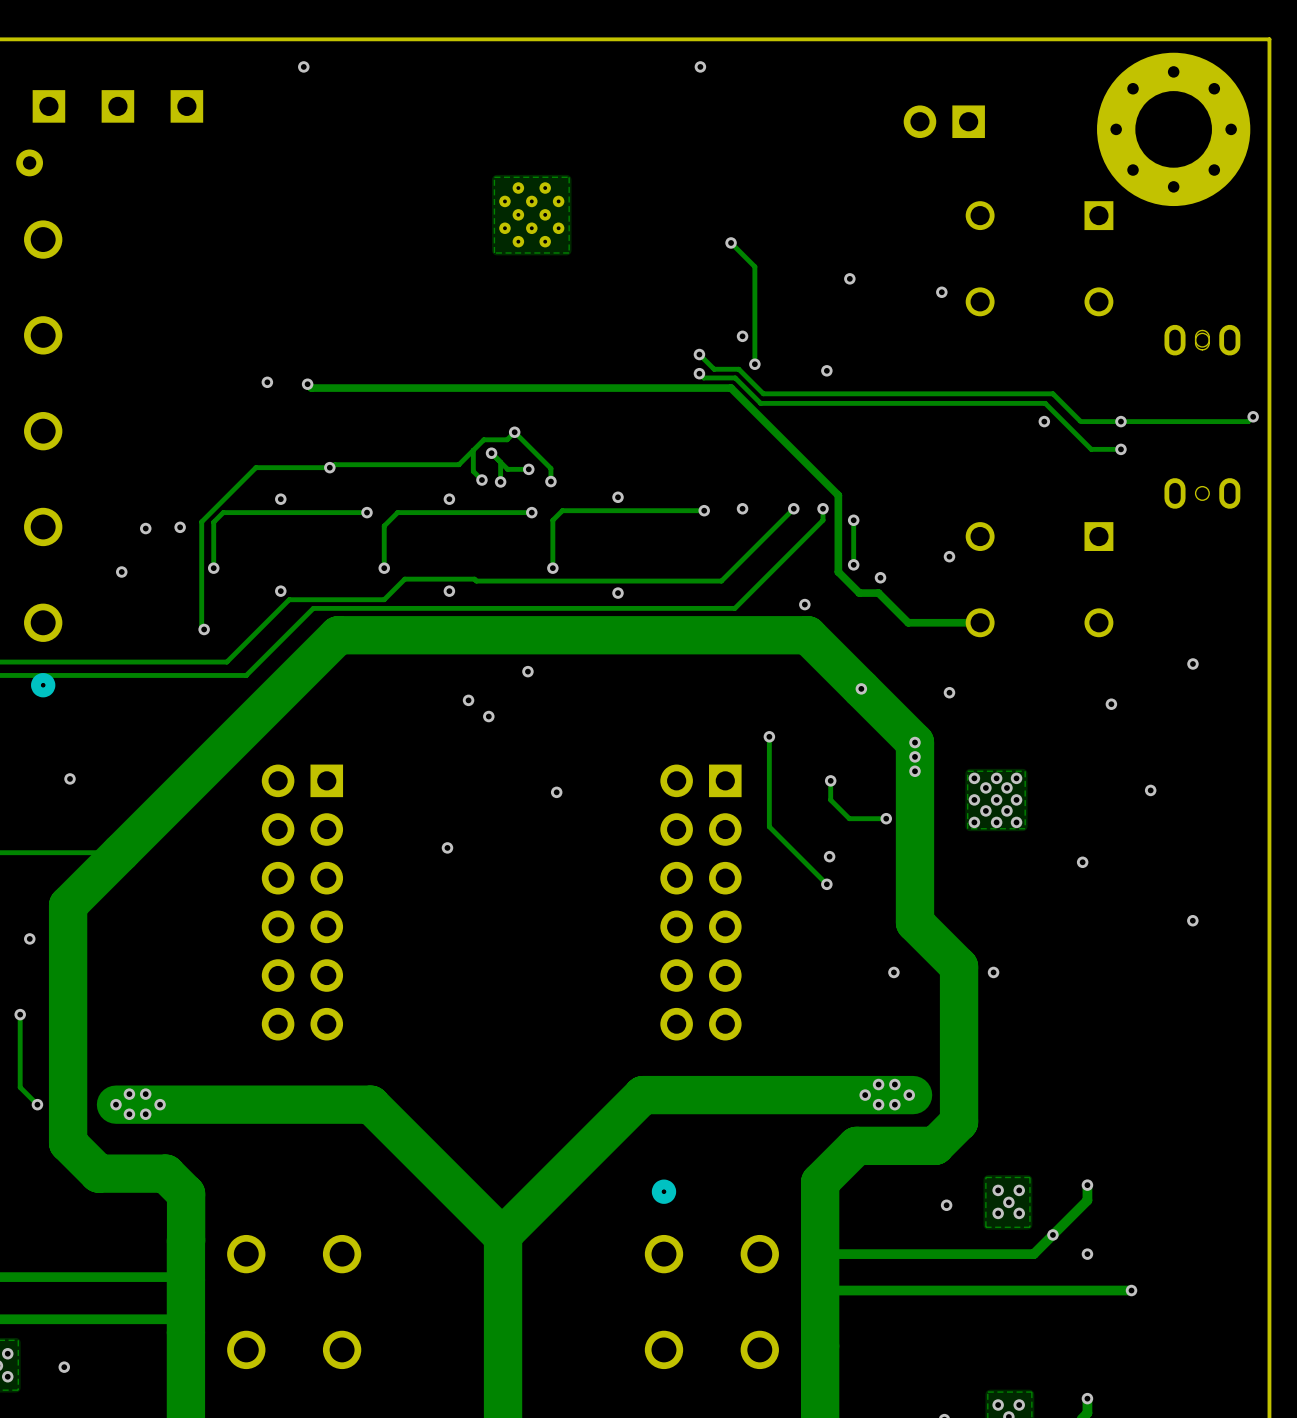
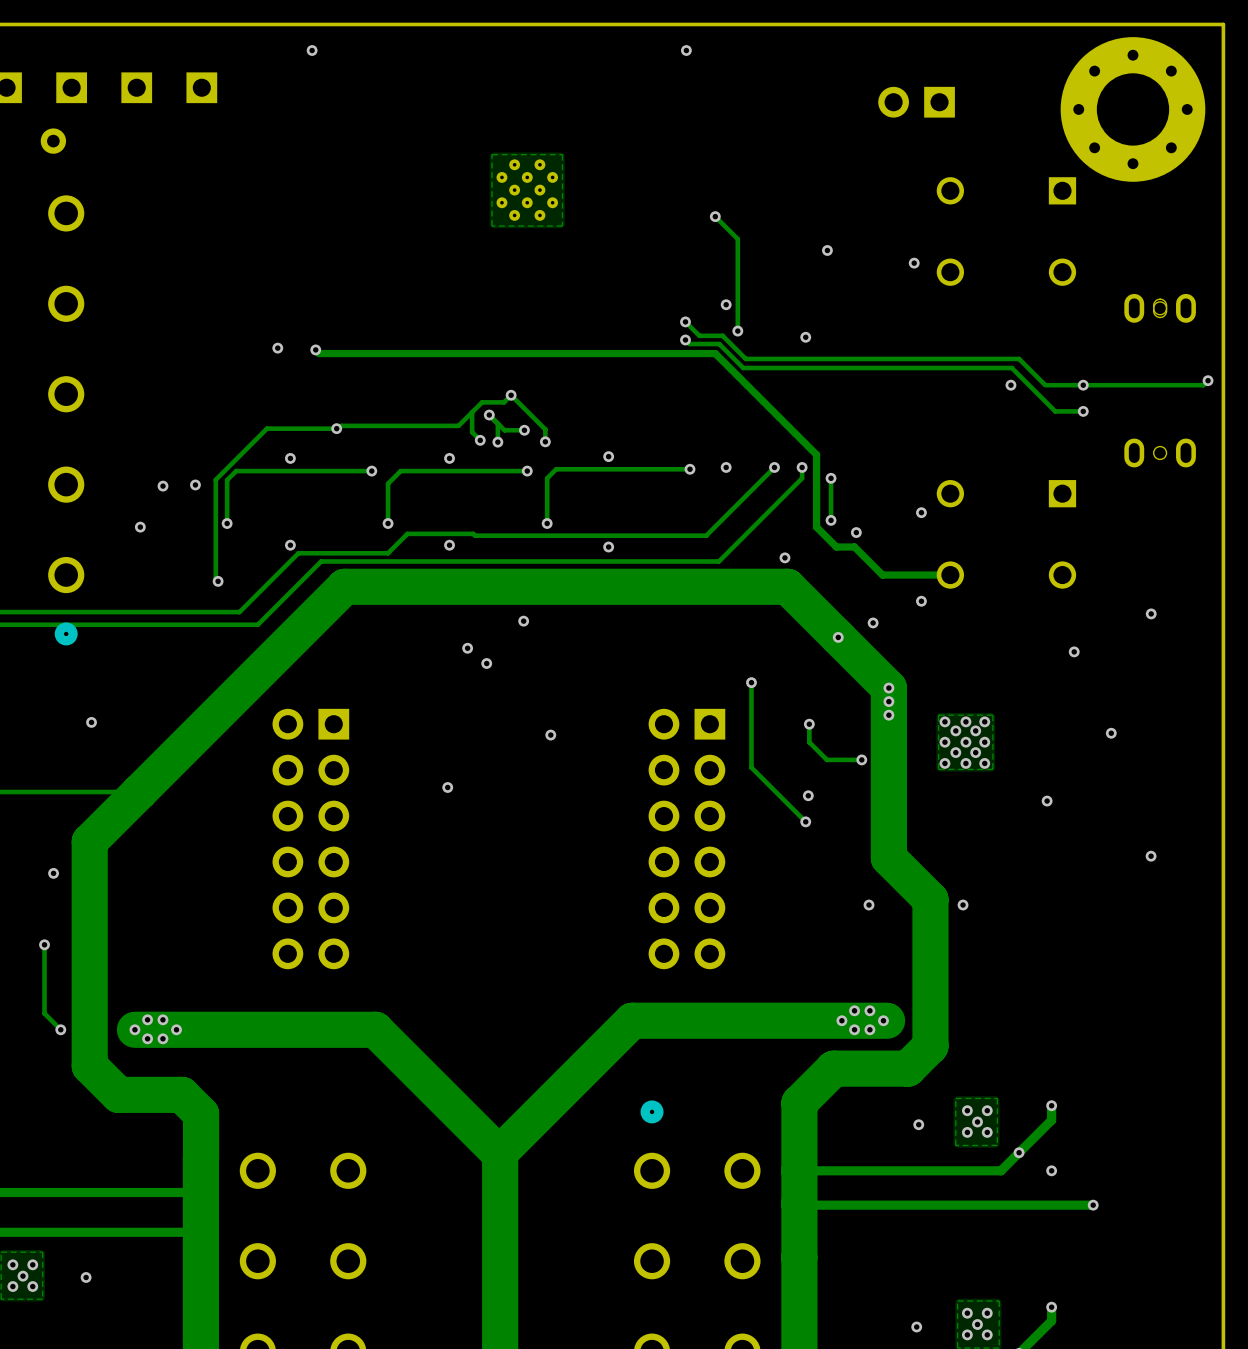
via: none -> (921, 601)
via: none -> (873, 622)
via: (949, 692) -> none

